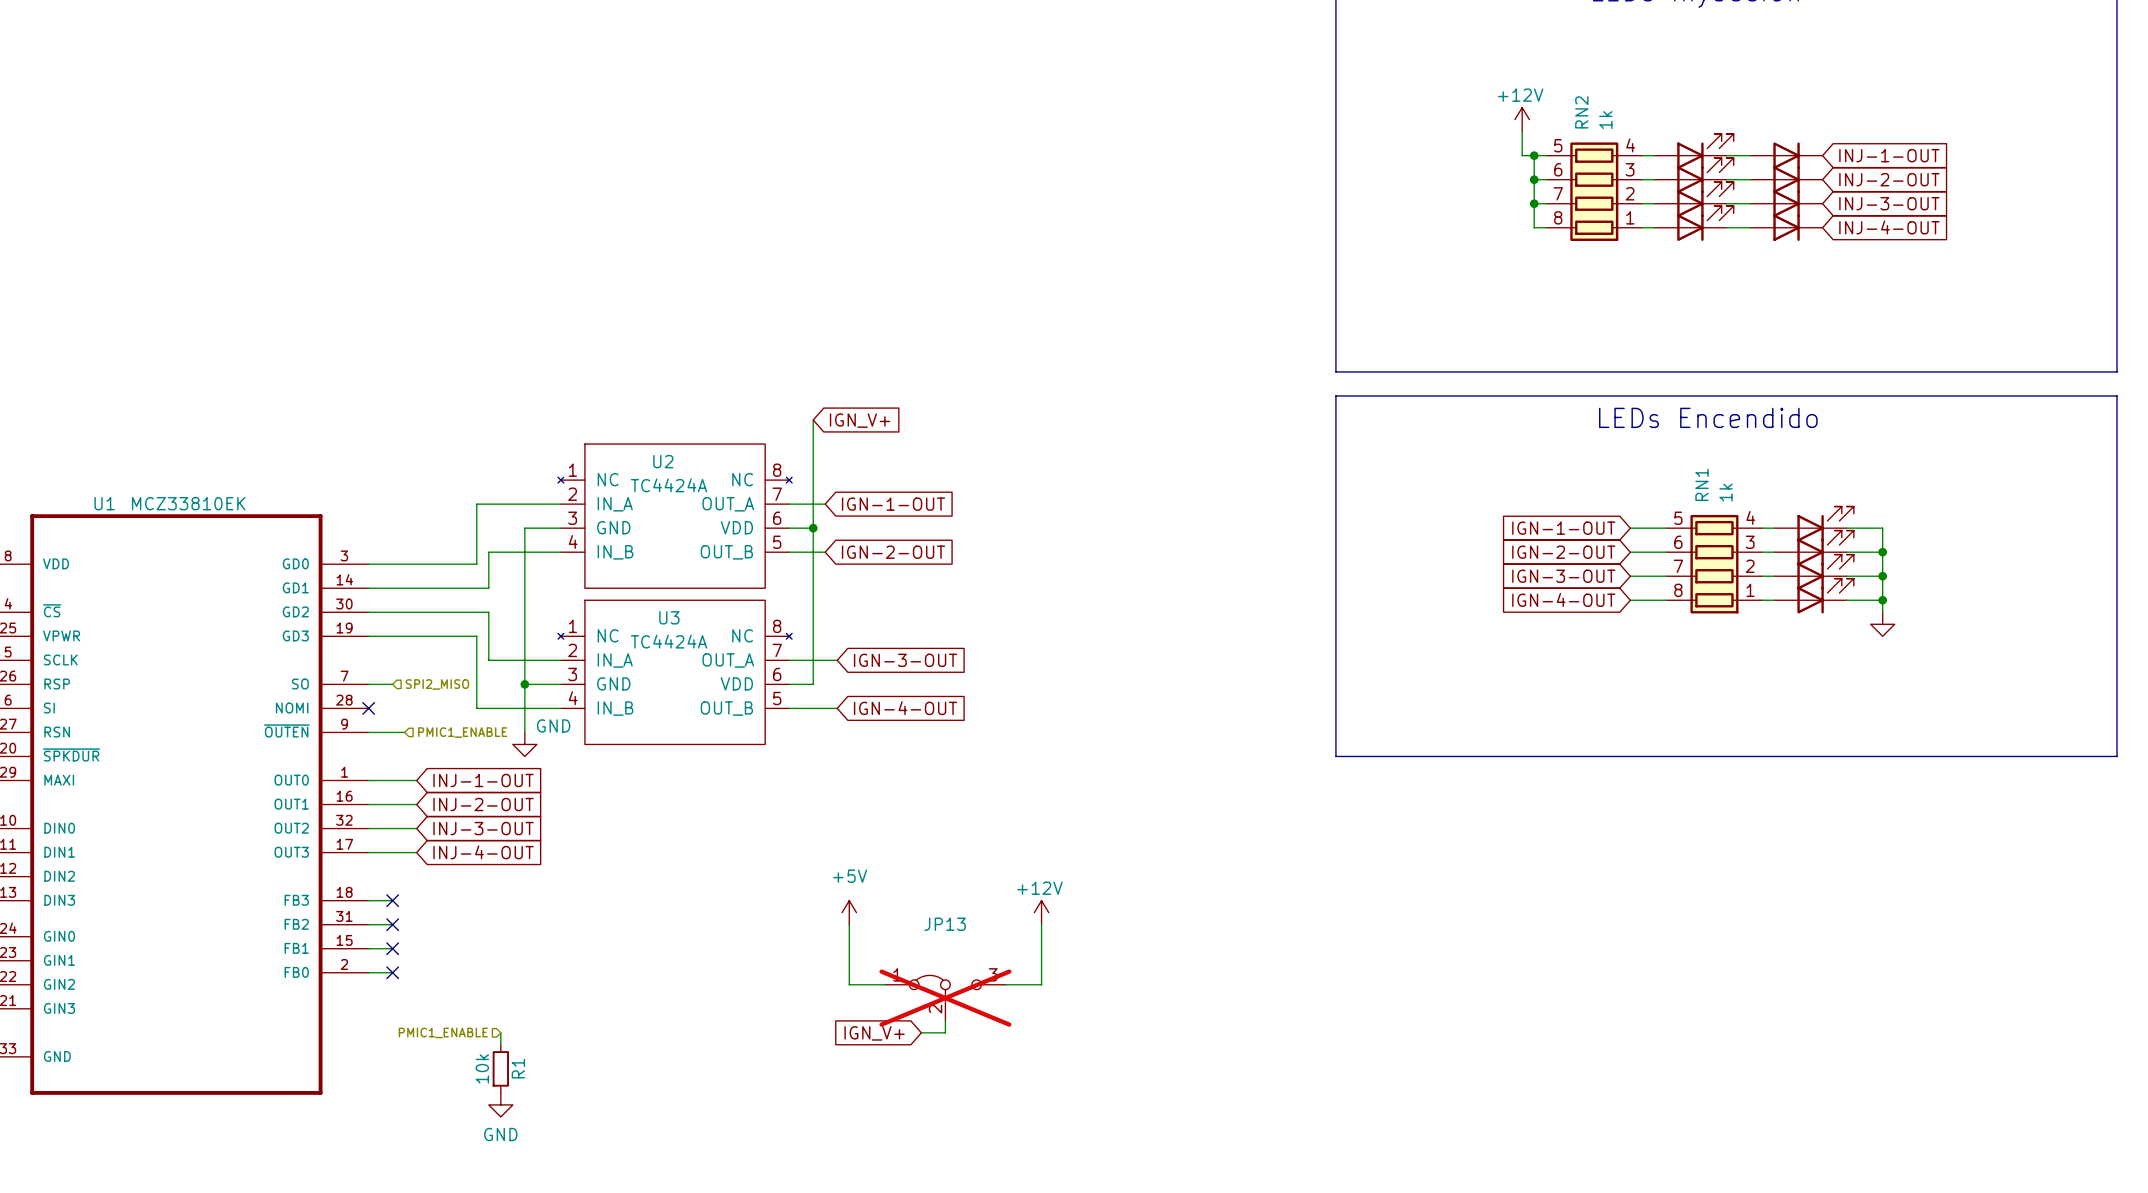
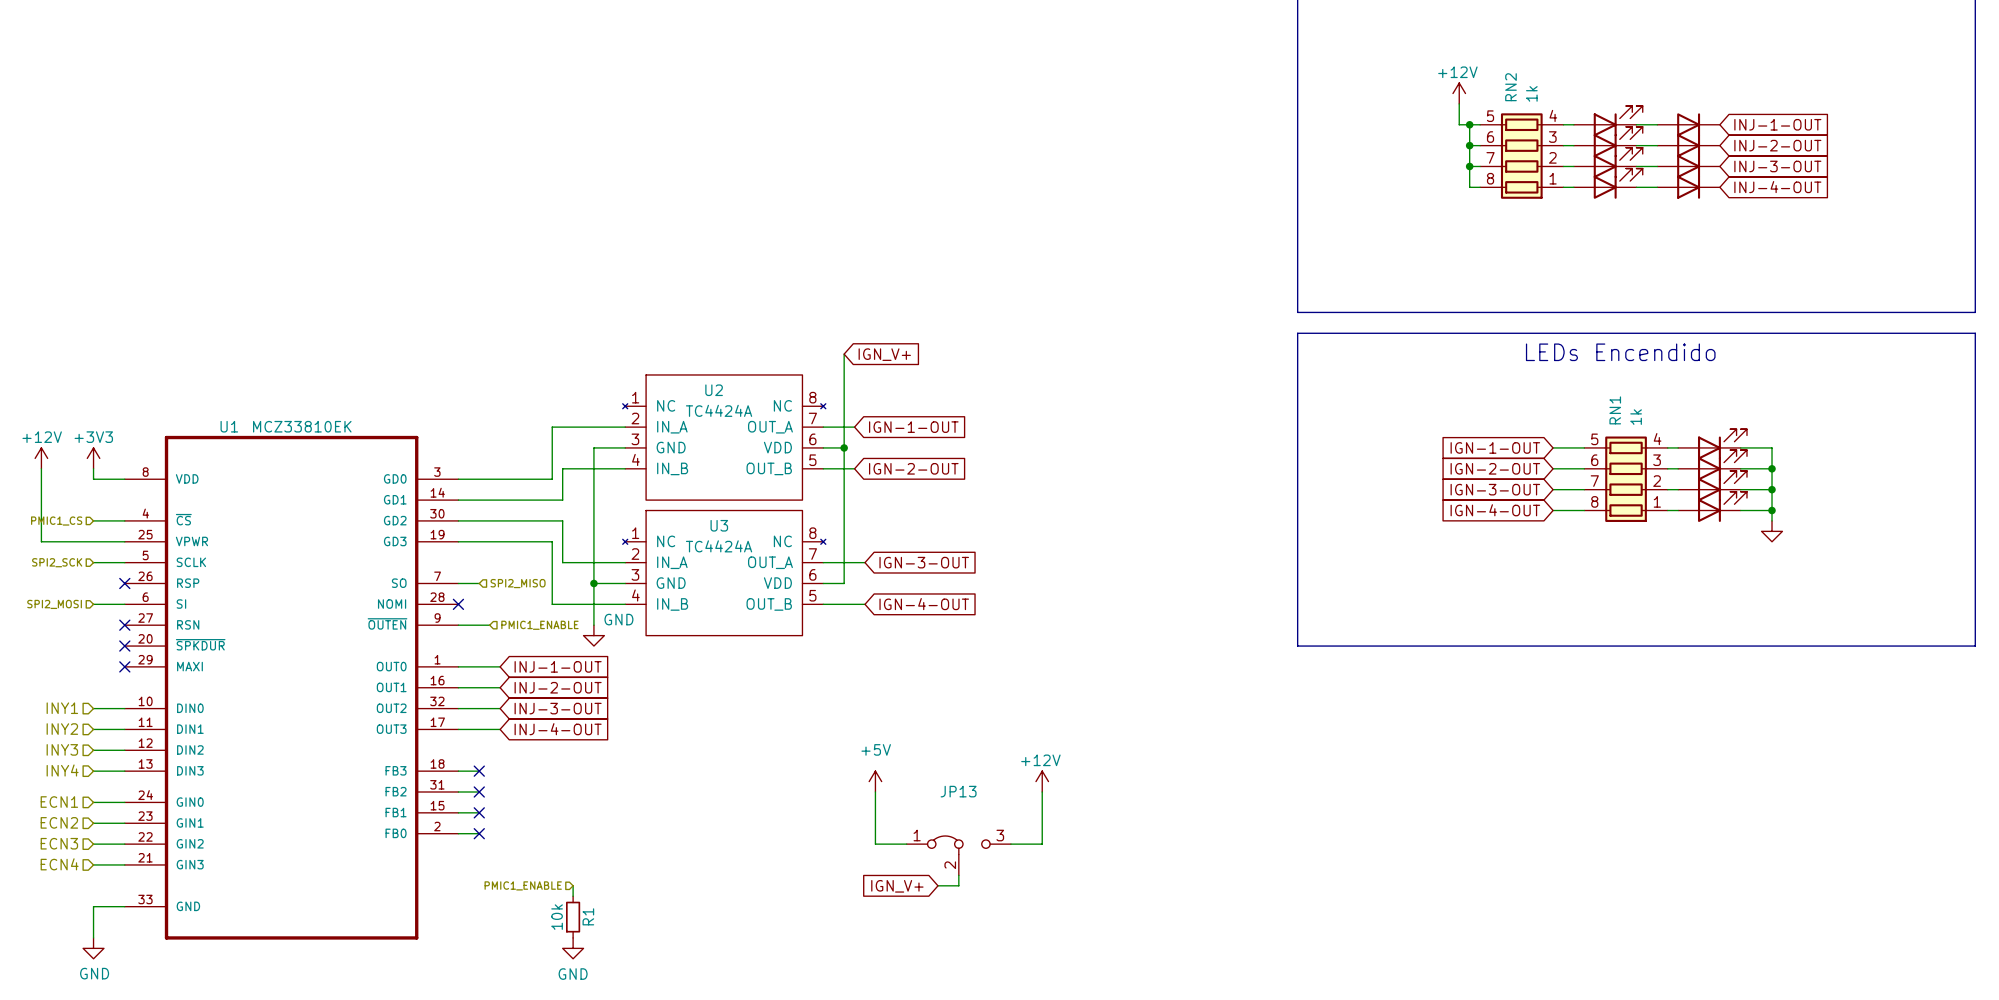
JP13 do-not-place cross: (945, 998) -> none

